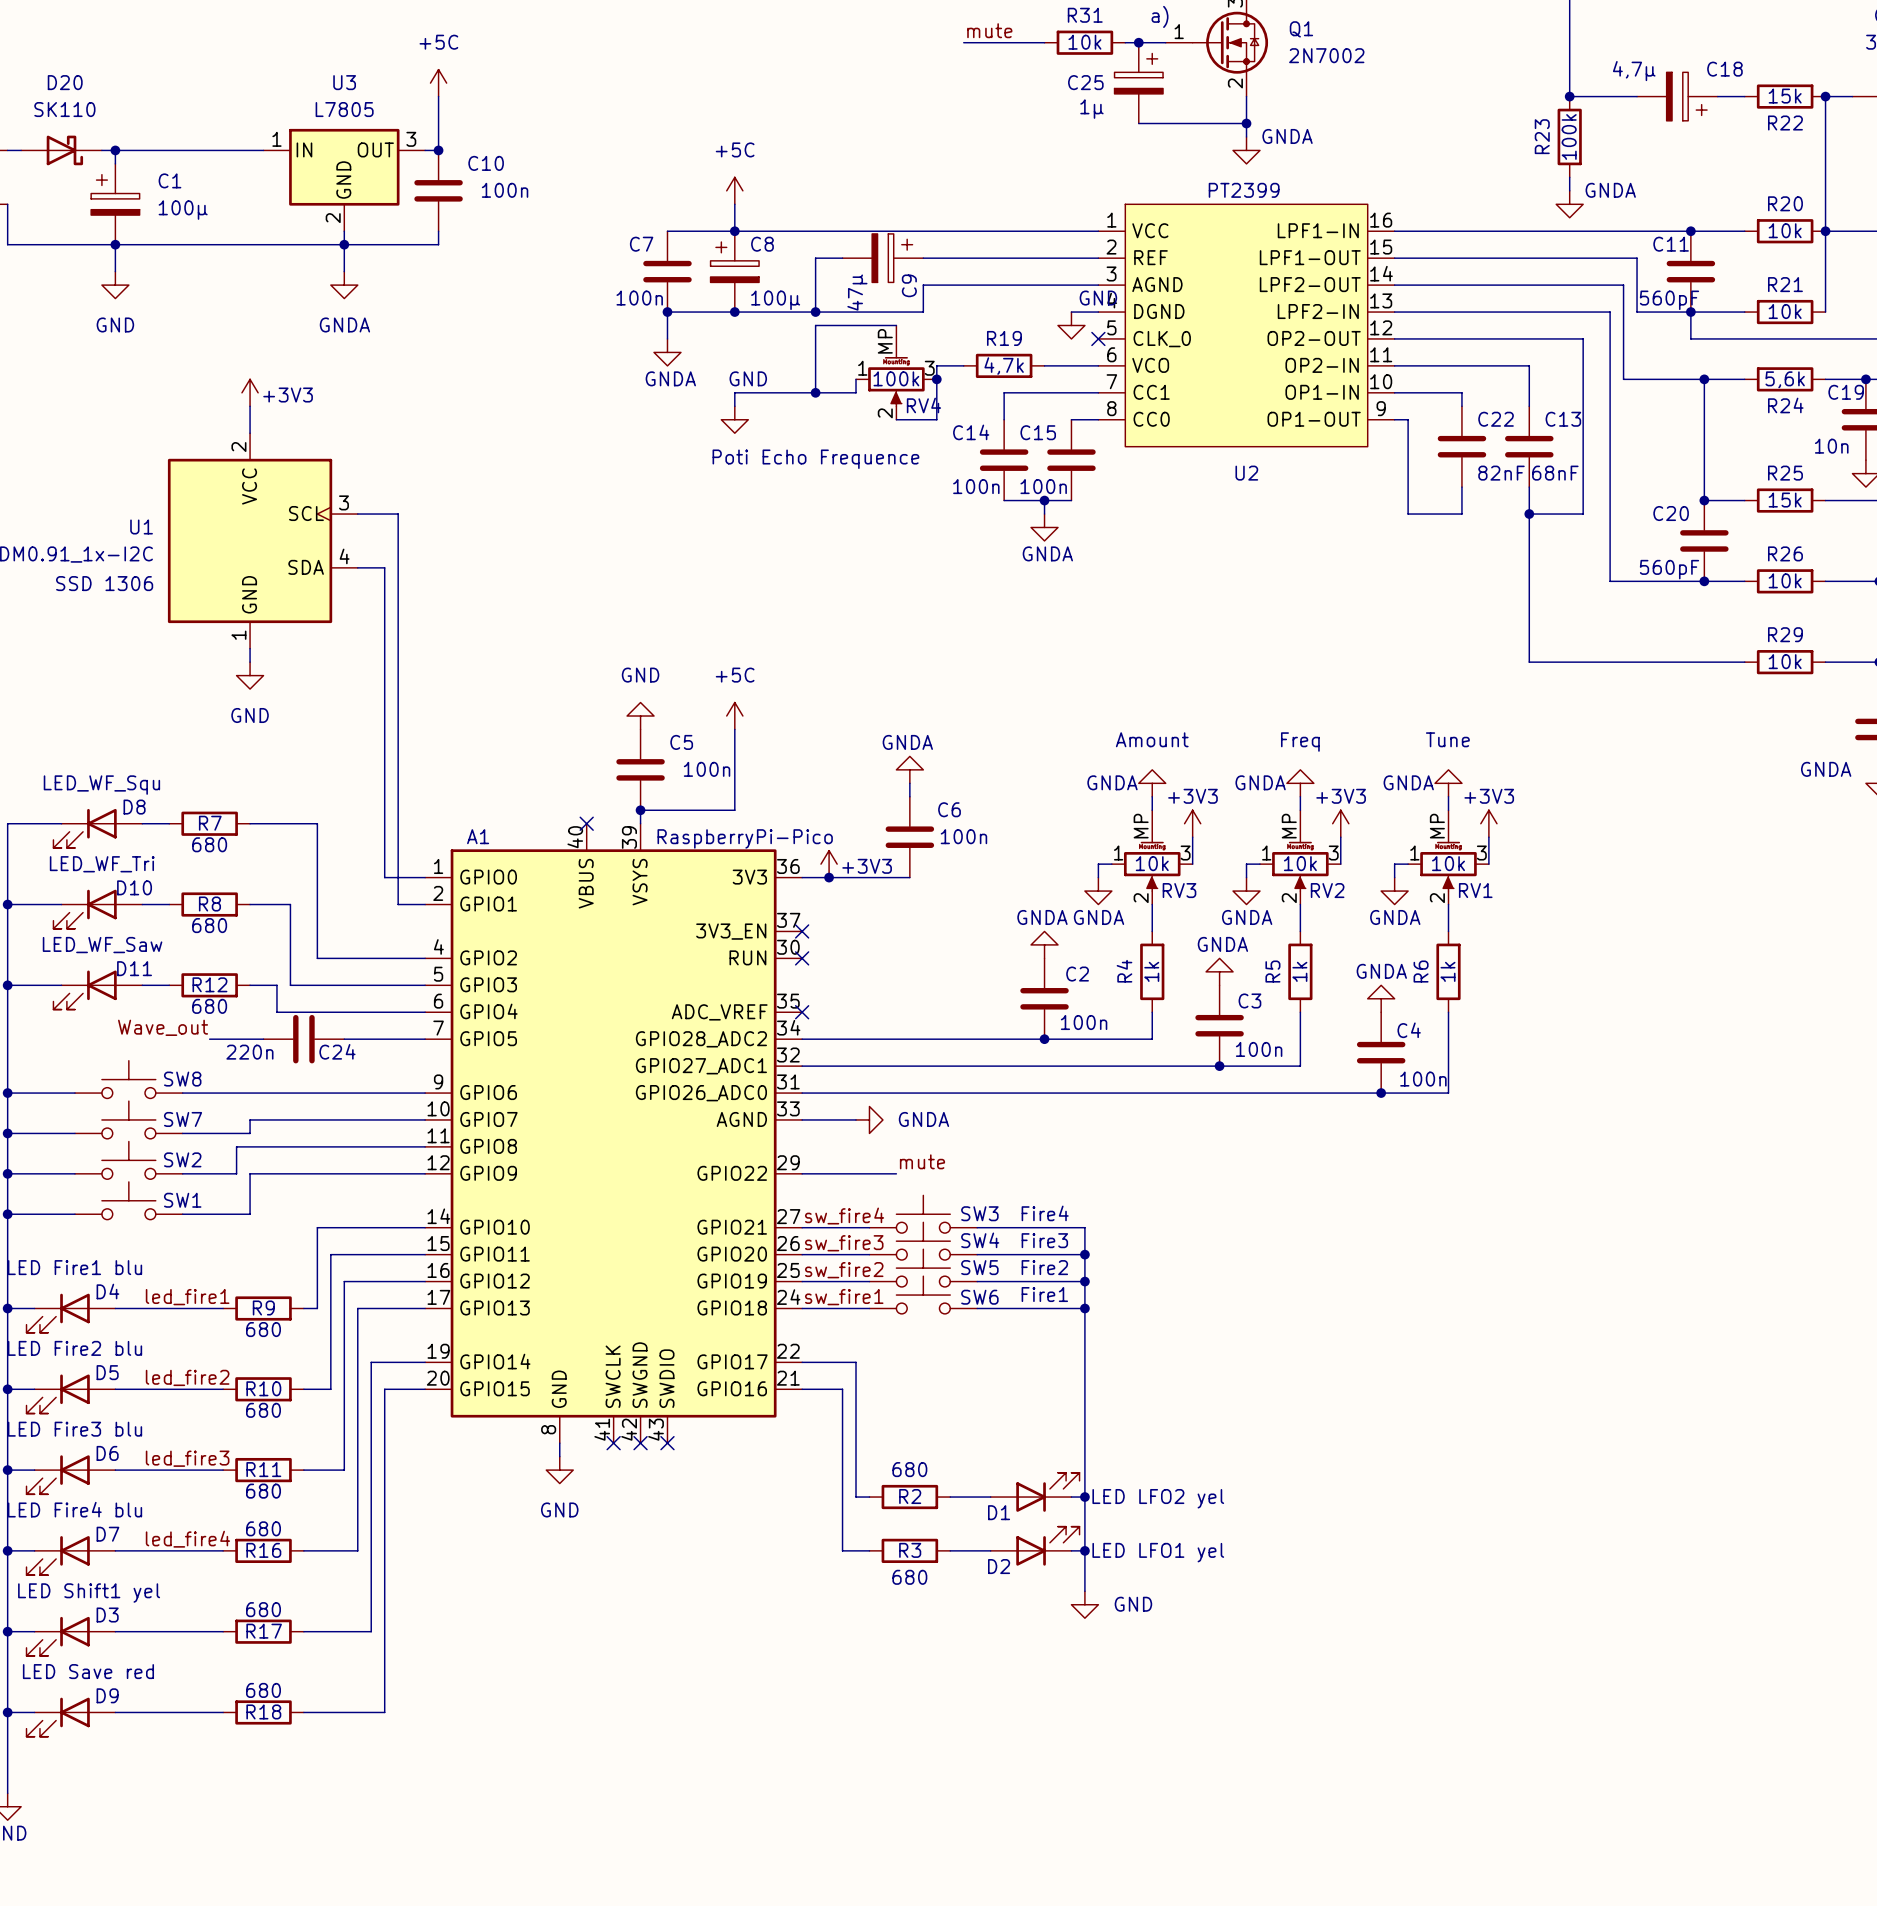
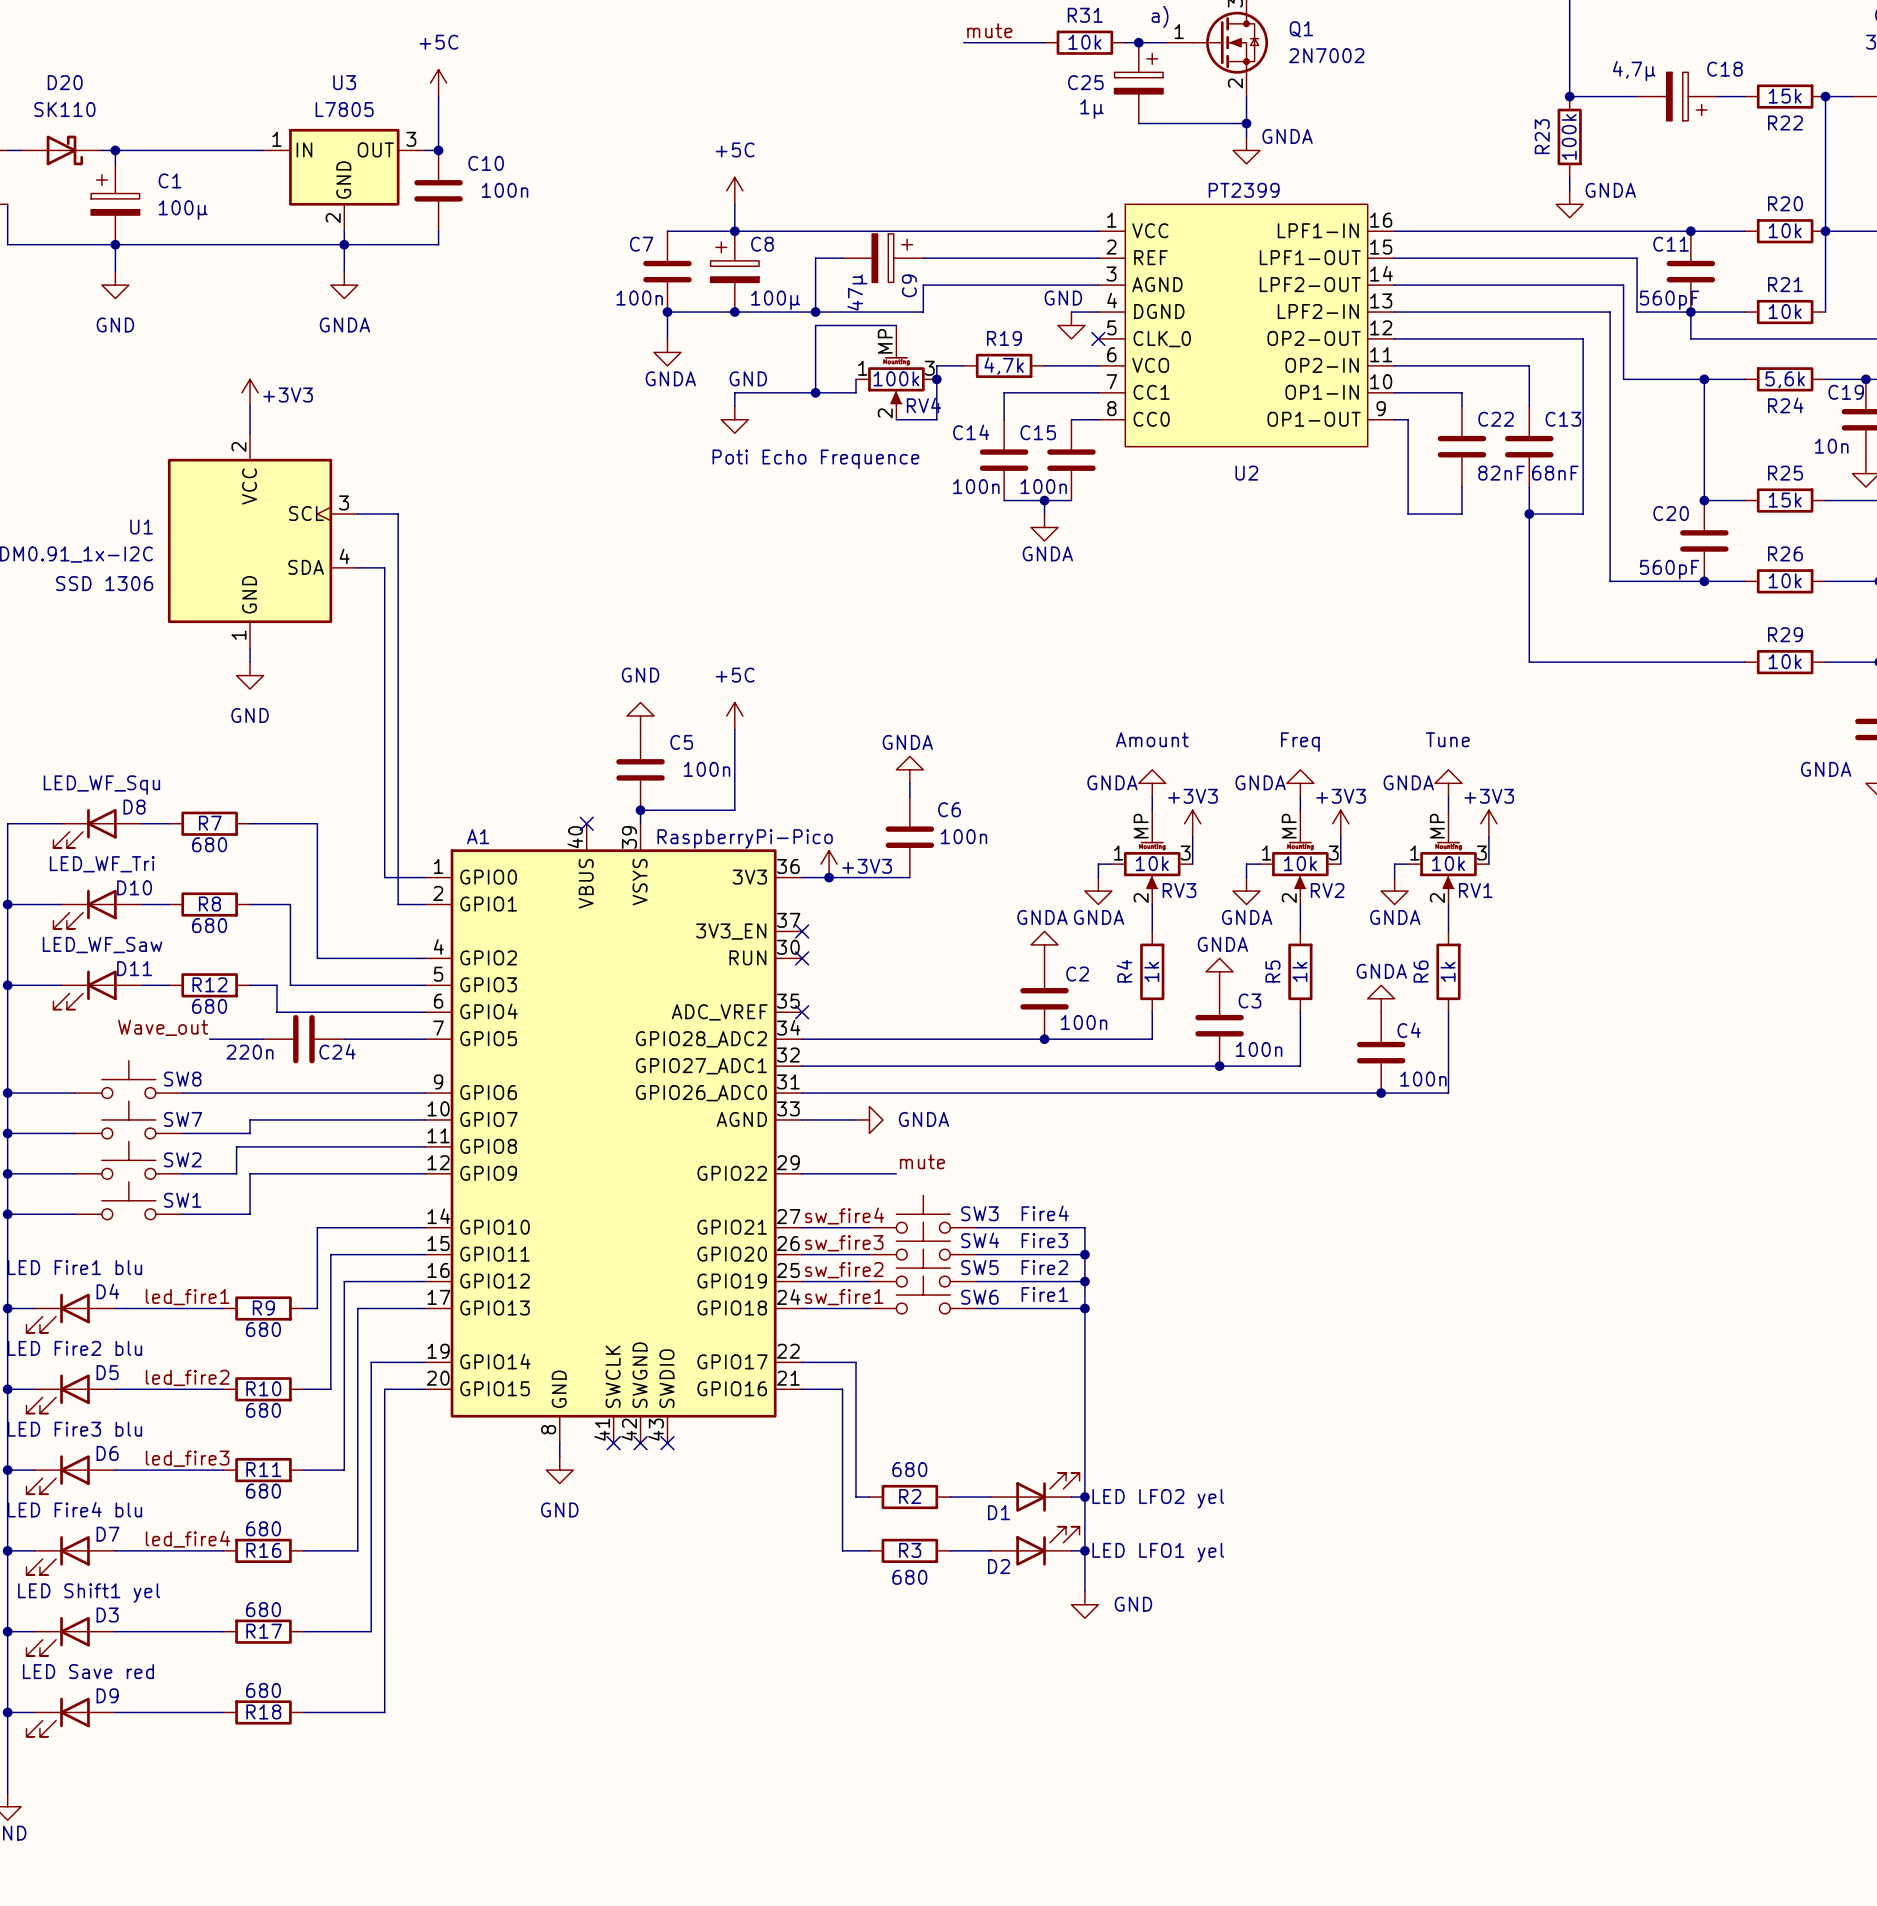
power symbol text position: GND (1098, 298) -> GND (1063, 298)

